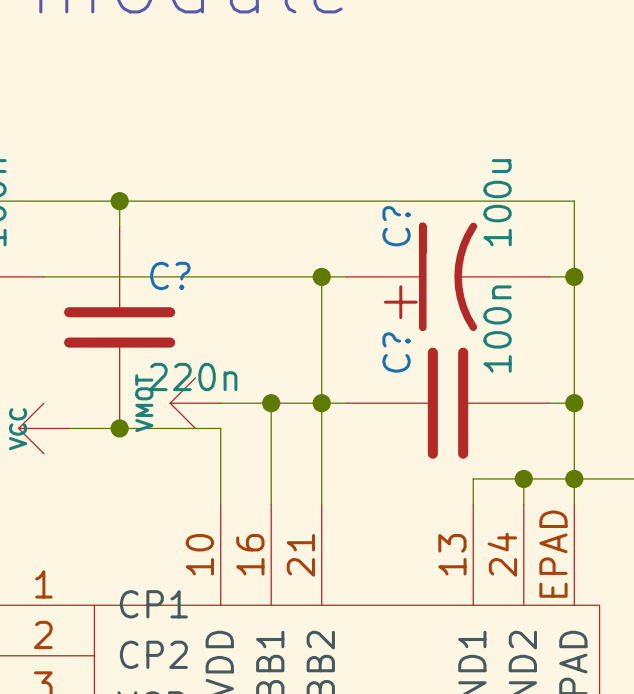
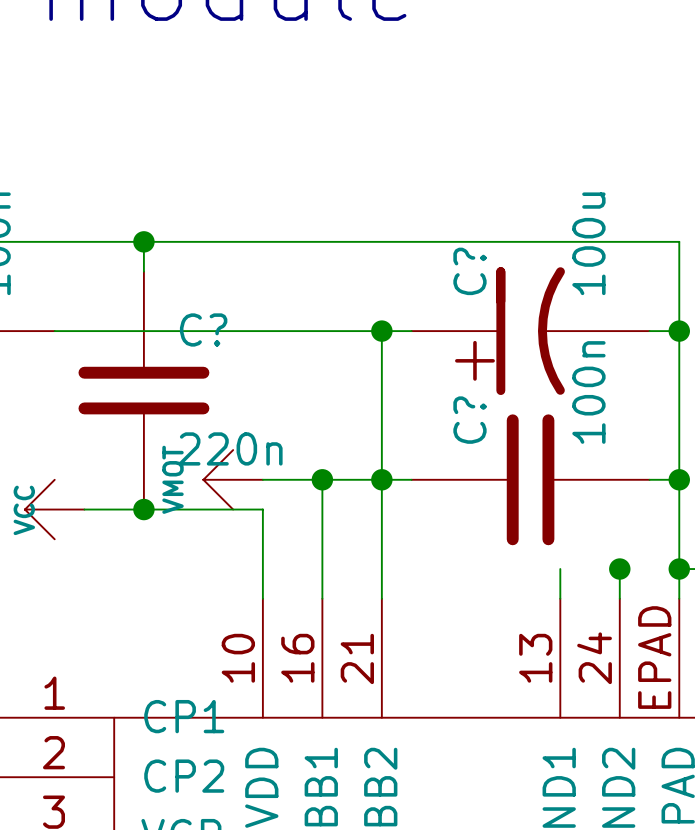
wire: (473, 478) (574, 478) -> none

